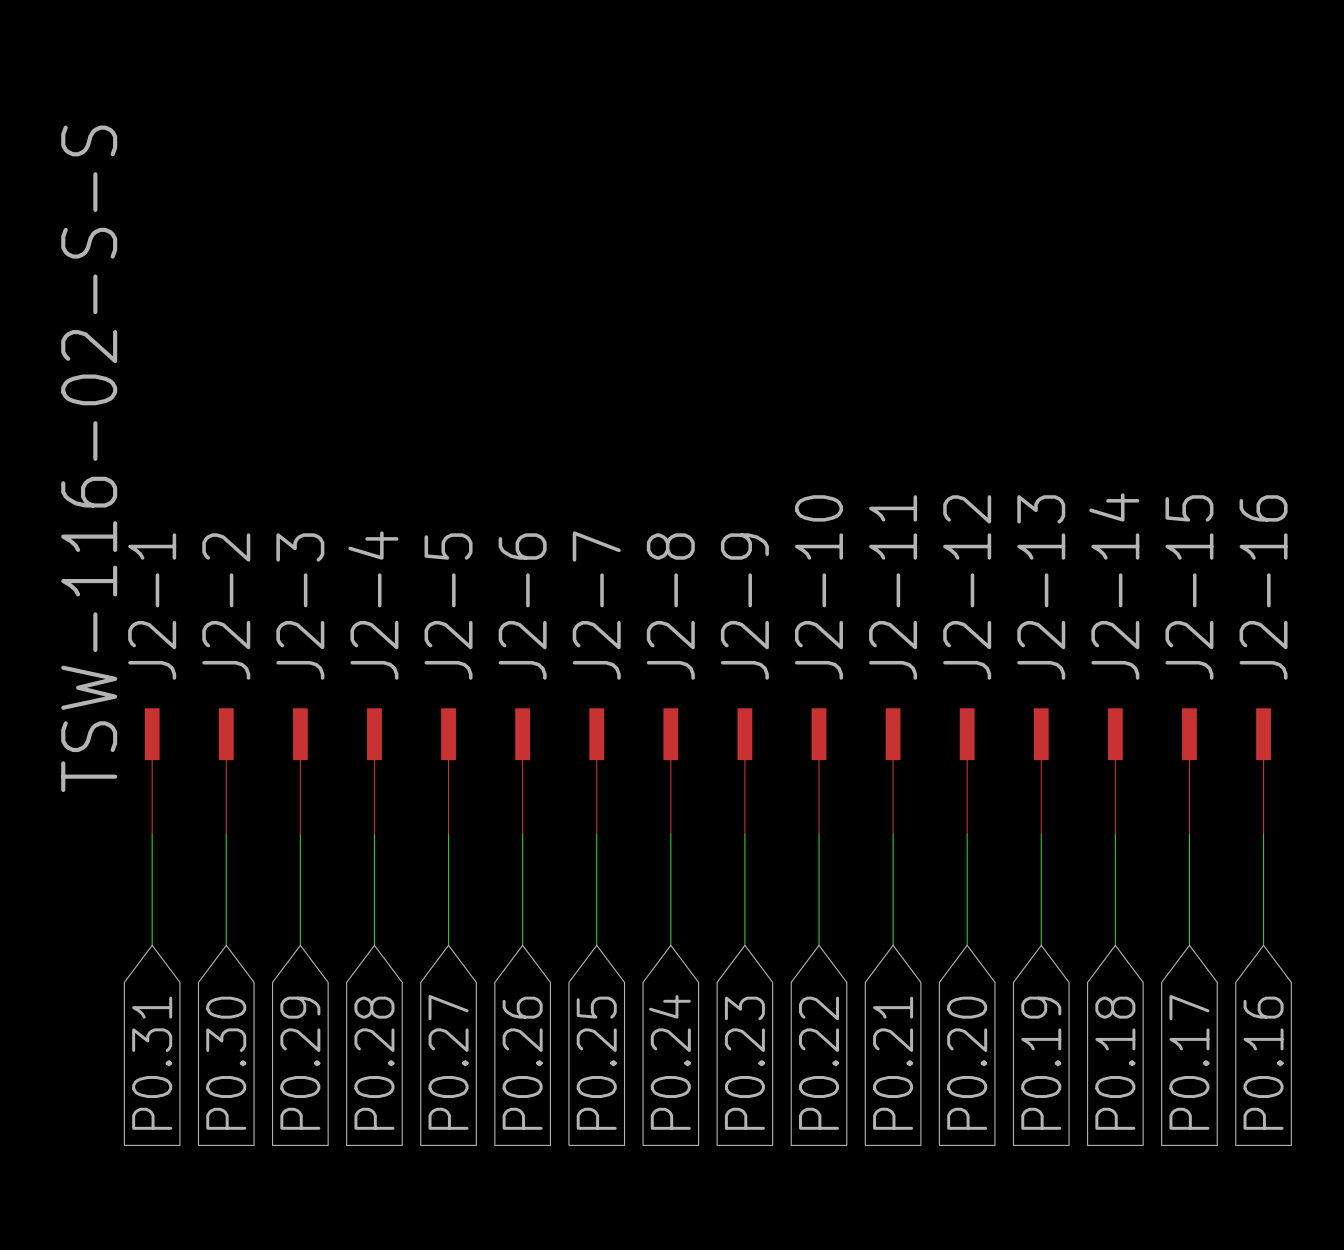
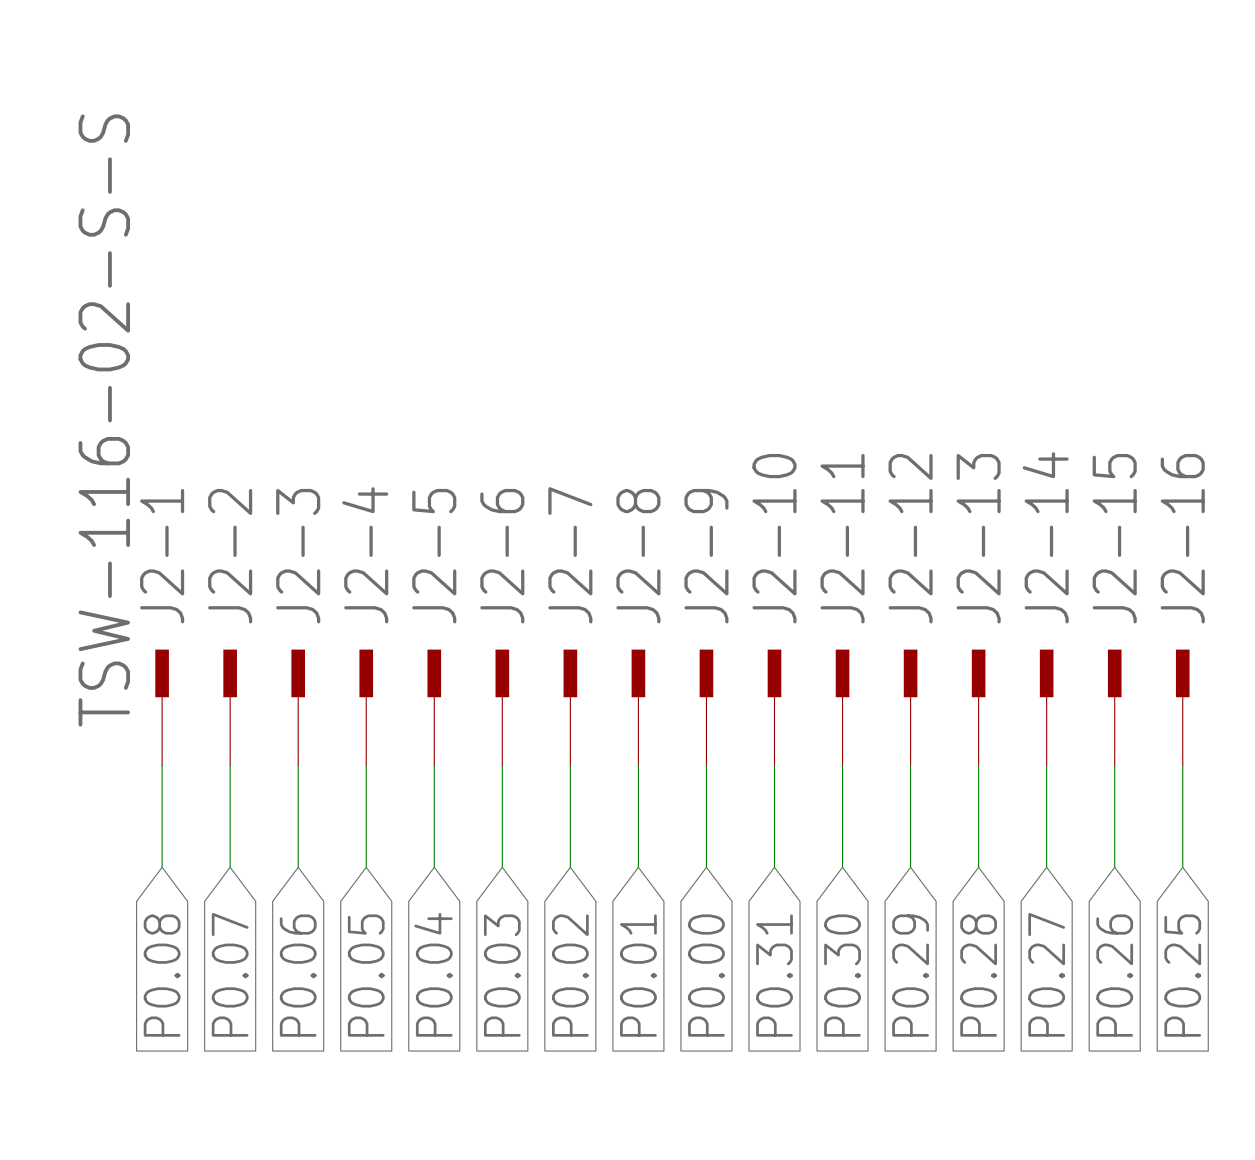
global label: P0.27 (448, 1062) -> P0.04 (433, 974)
global label: P0.24 (669, 1062) -> P0.01 (638, 975)
global label: P0.17 (1189, 1062) -> P0.26 (1114, 975)
global label: P0.31 (152, 1063) -> P0.08 (162, 975)
global label: P0.30 (226, 1063) -> P0.07 (230, 974)
global label: P0.29 (300, 1063) -> P0.06 (298, 975)
global label: P0.28 (374, 1063) -> P0.05 (366, 975)
global label: P0.26 (522, 1063) -> P0.03 (502, 975)
global label: P0.25 (596, 1063) -> P0.02 (570, 975)
global label: P0.23 (744, 1063) -> P0.00 (706, 975)
global label: P0.22 (819, 1063) -> P0.31 (774, 975)
global label: P0.21 (893, 1063) -> P0.30 (842, 975)
global label: P0.20 (967, 1063) -> P0.29 (910, 975)
global label: P0.19 (1041, 1063) -> P0.28 (978, 975)
global label: P0.18 (1115, 1063) -> P0.27 (1046, 974)
global label: P0.16 (1263, 1063) -> P0.25 (1182, 975)

